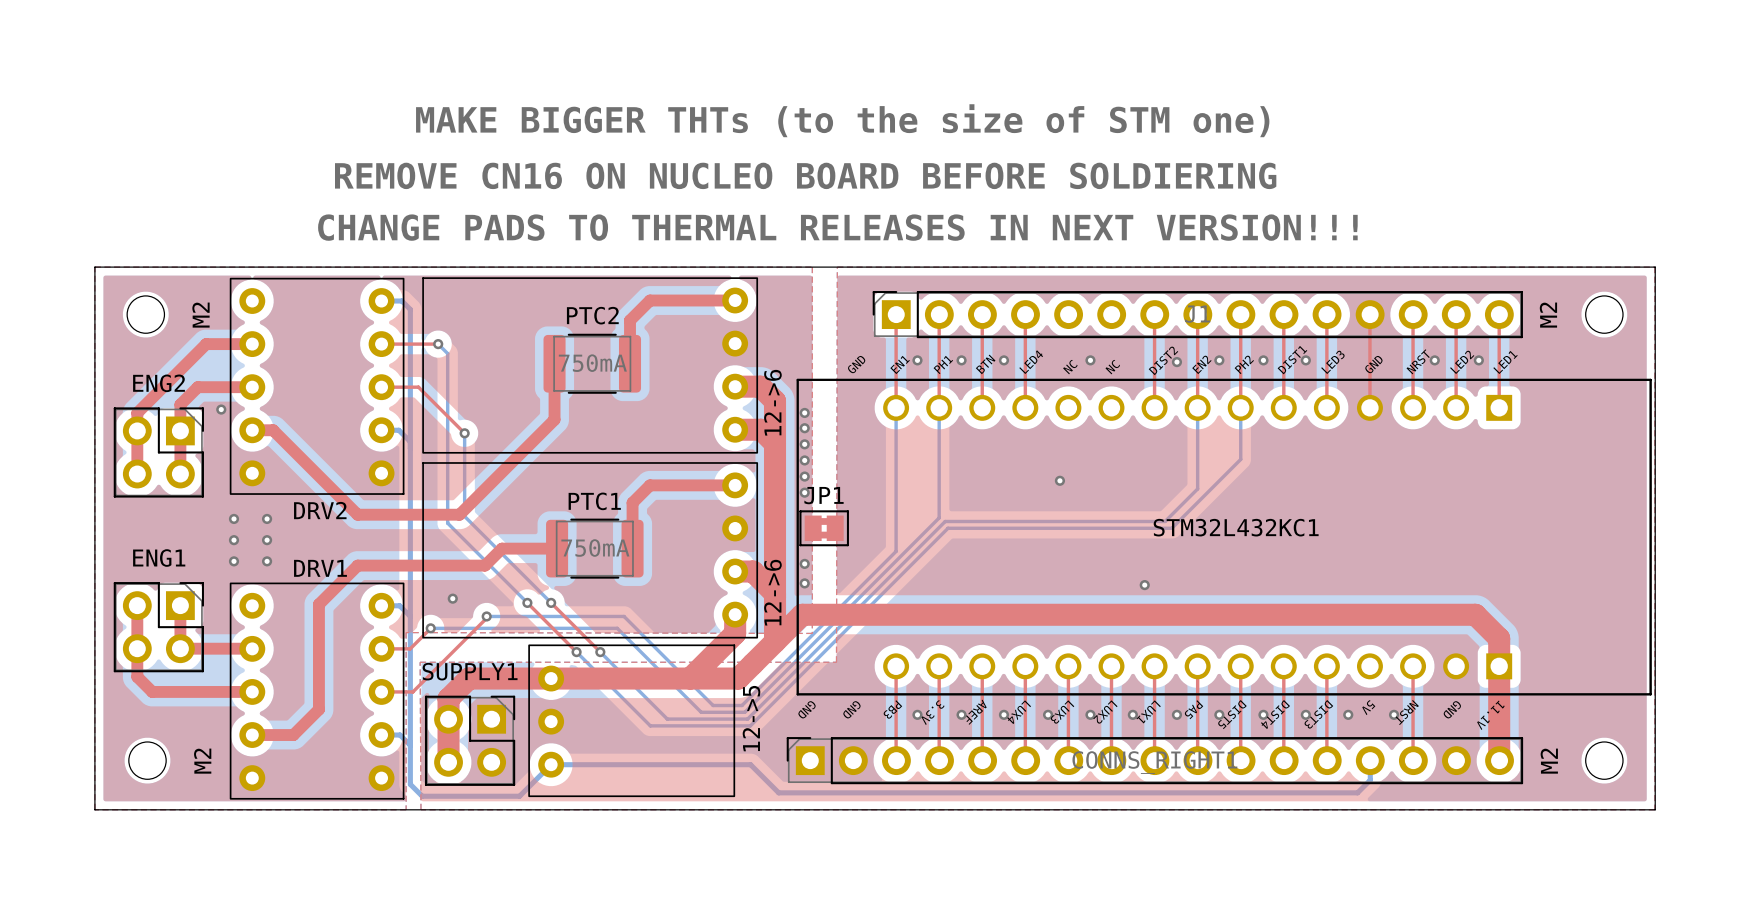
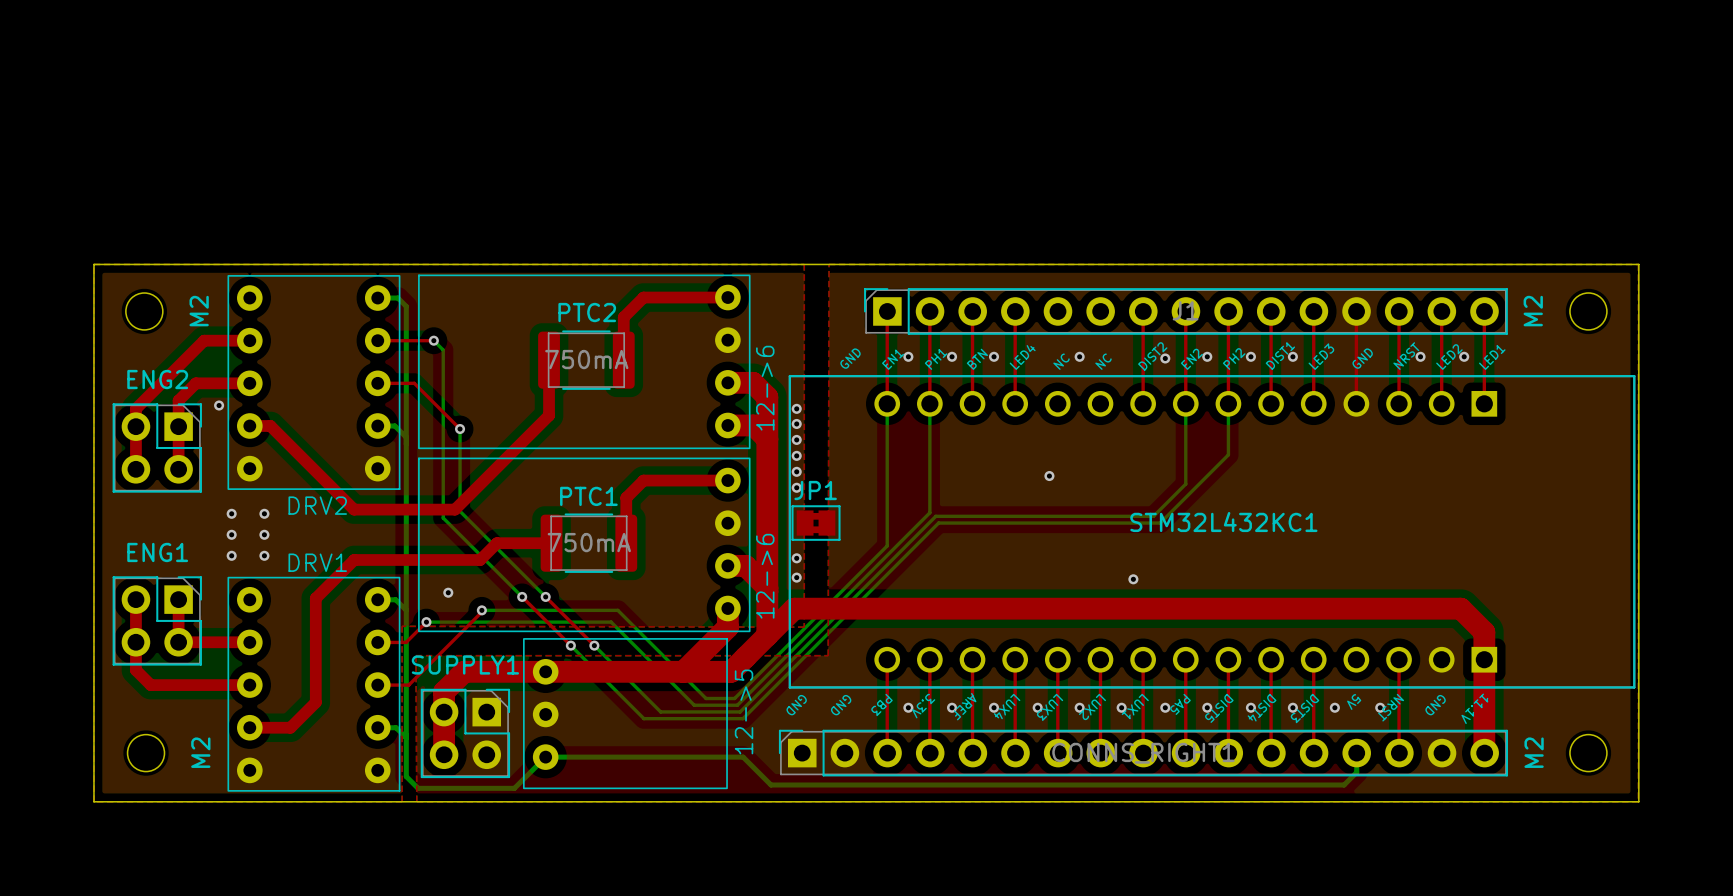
text: MAKE BIGGER THTs (to the size of STM one) (842, 120) -> none
text: REMOVE CN16 ON NUCLEO BOARD BEFORE SOLDIERING (805, 175) -> none
text: CHANGE PADS TO THERMAL RELEASES IN NEXT VERSION!!! (837, 227) -> none

